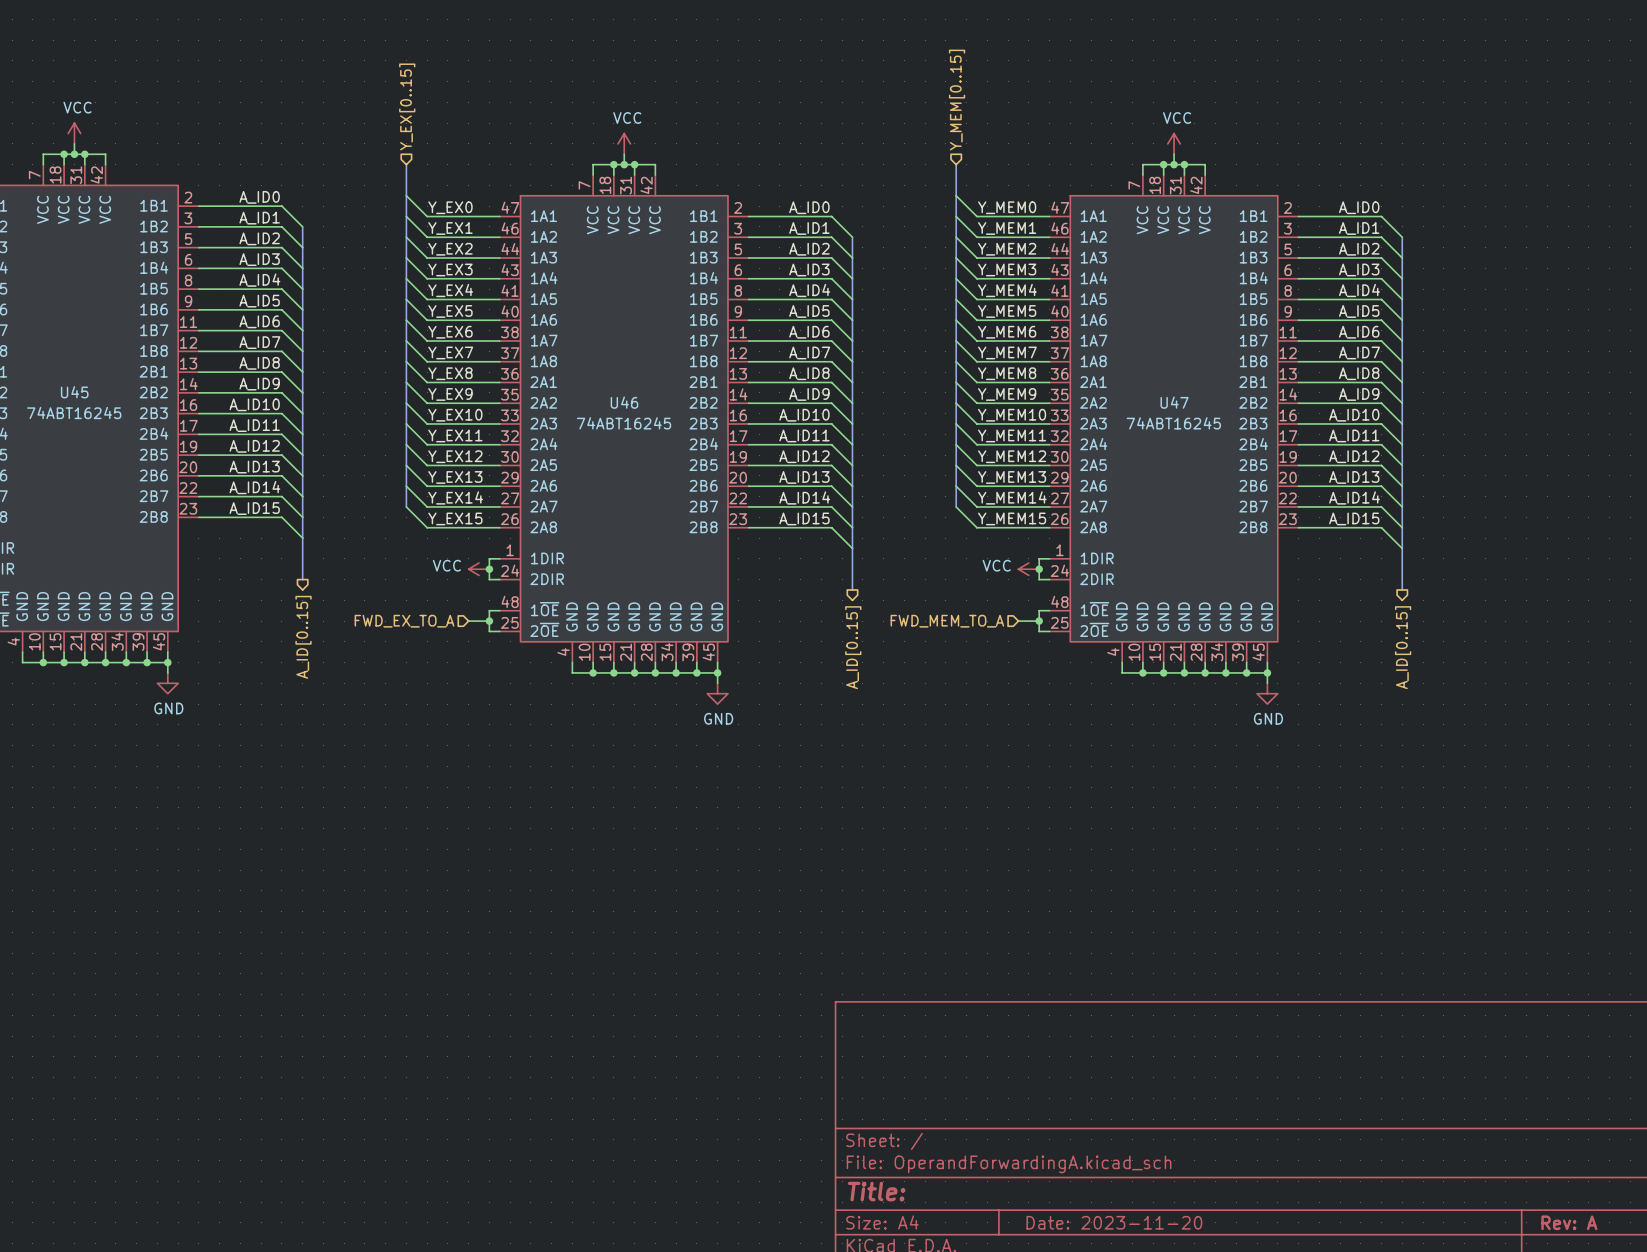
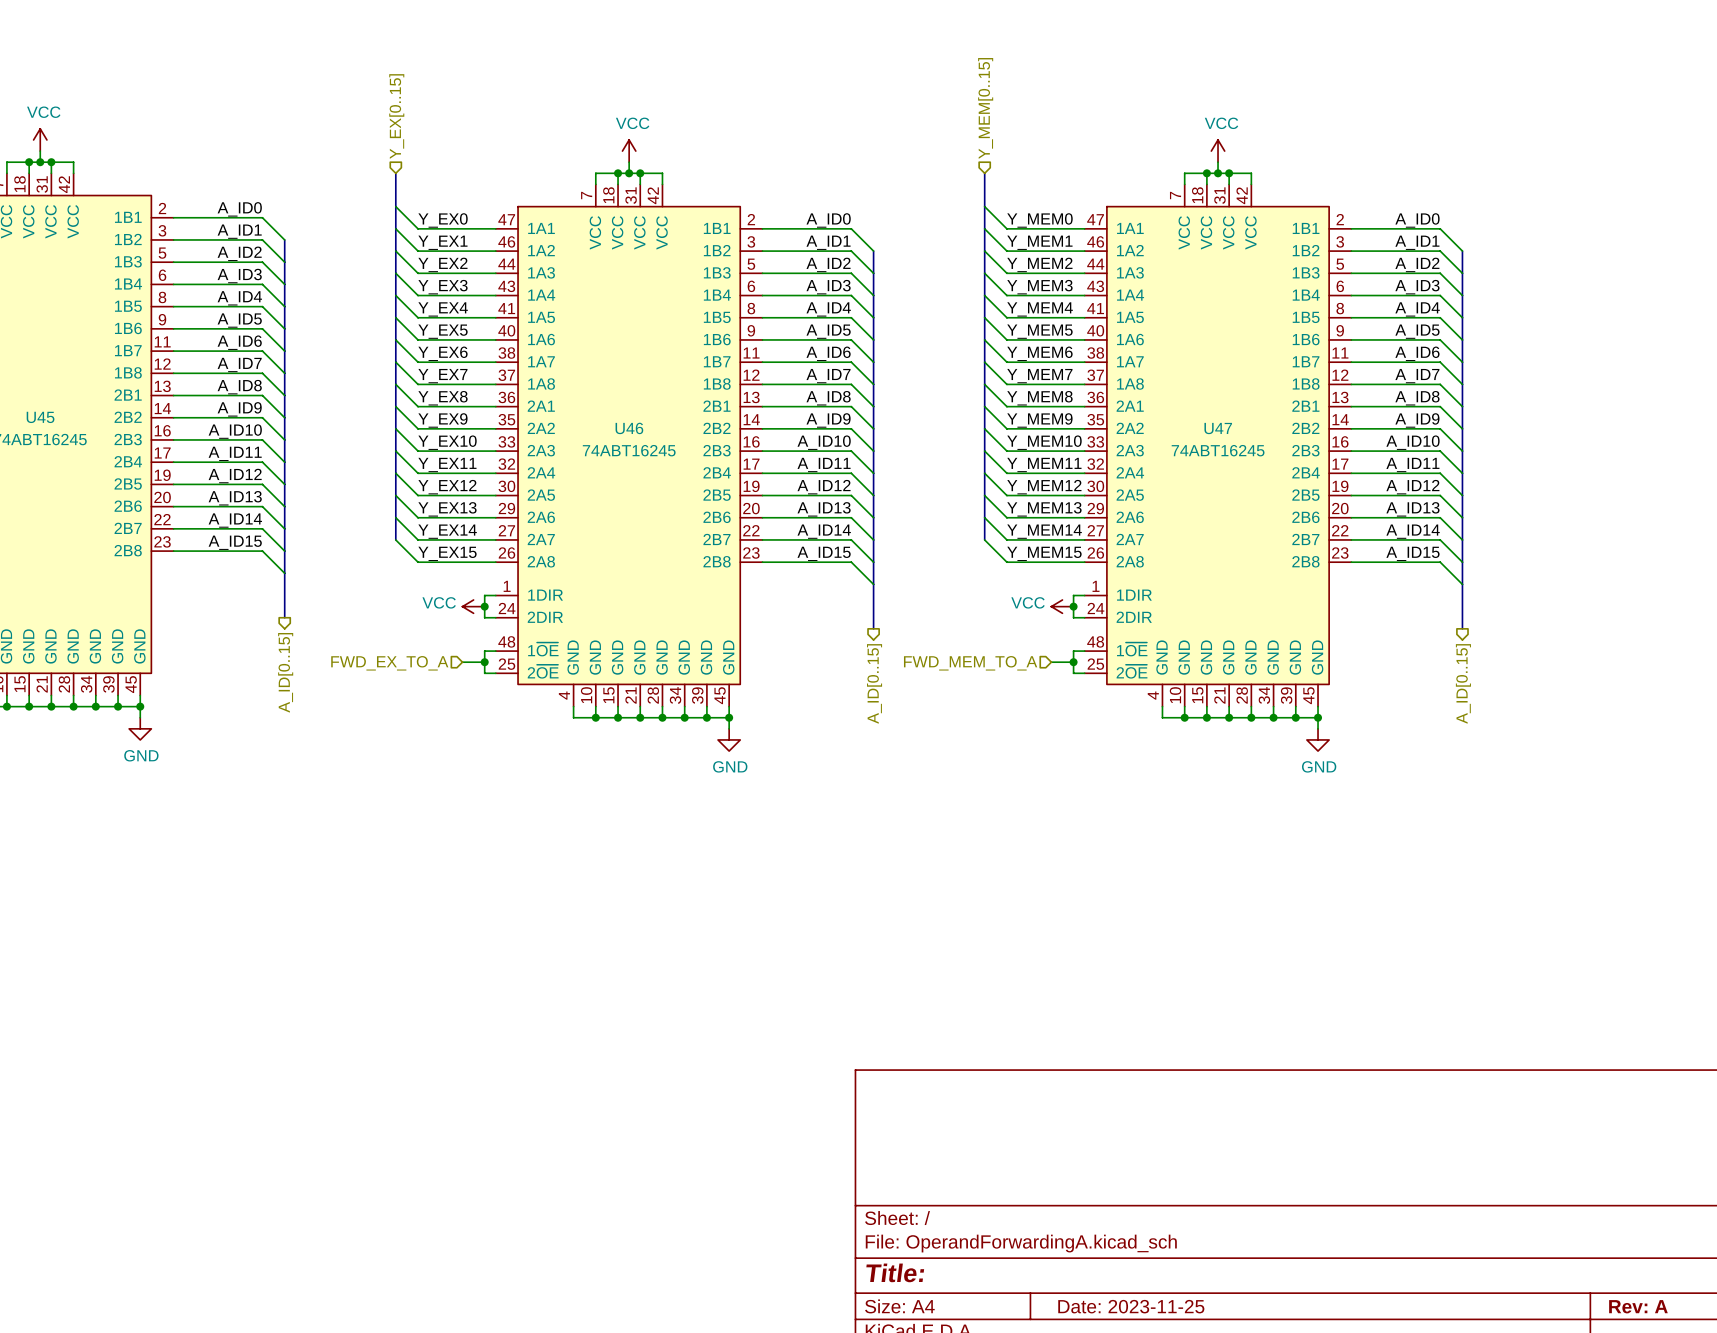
title block: Date: 2023-11-20 (1114, 1222) -> Date: 2023-11-25 (1131, 1306)

